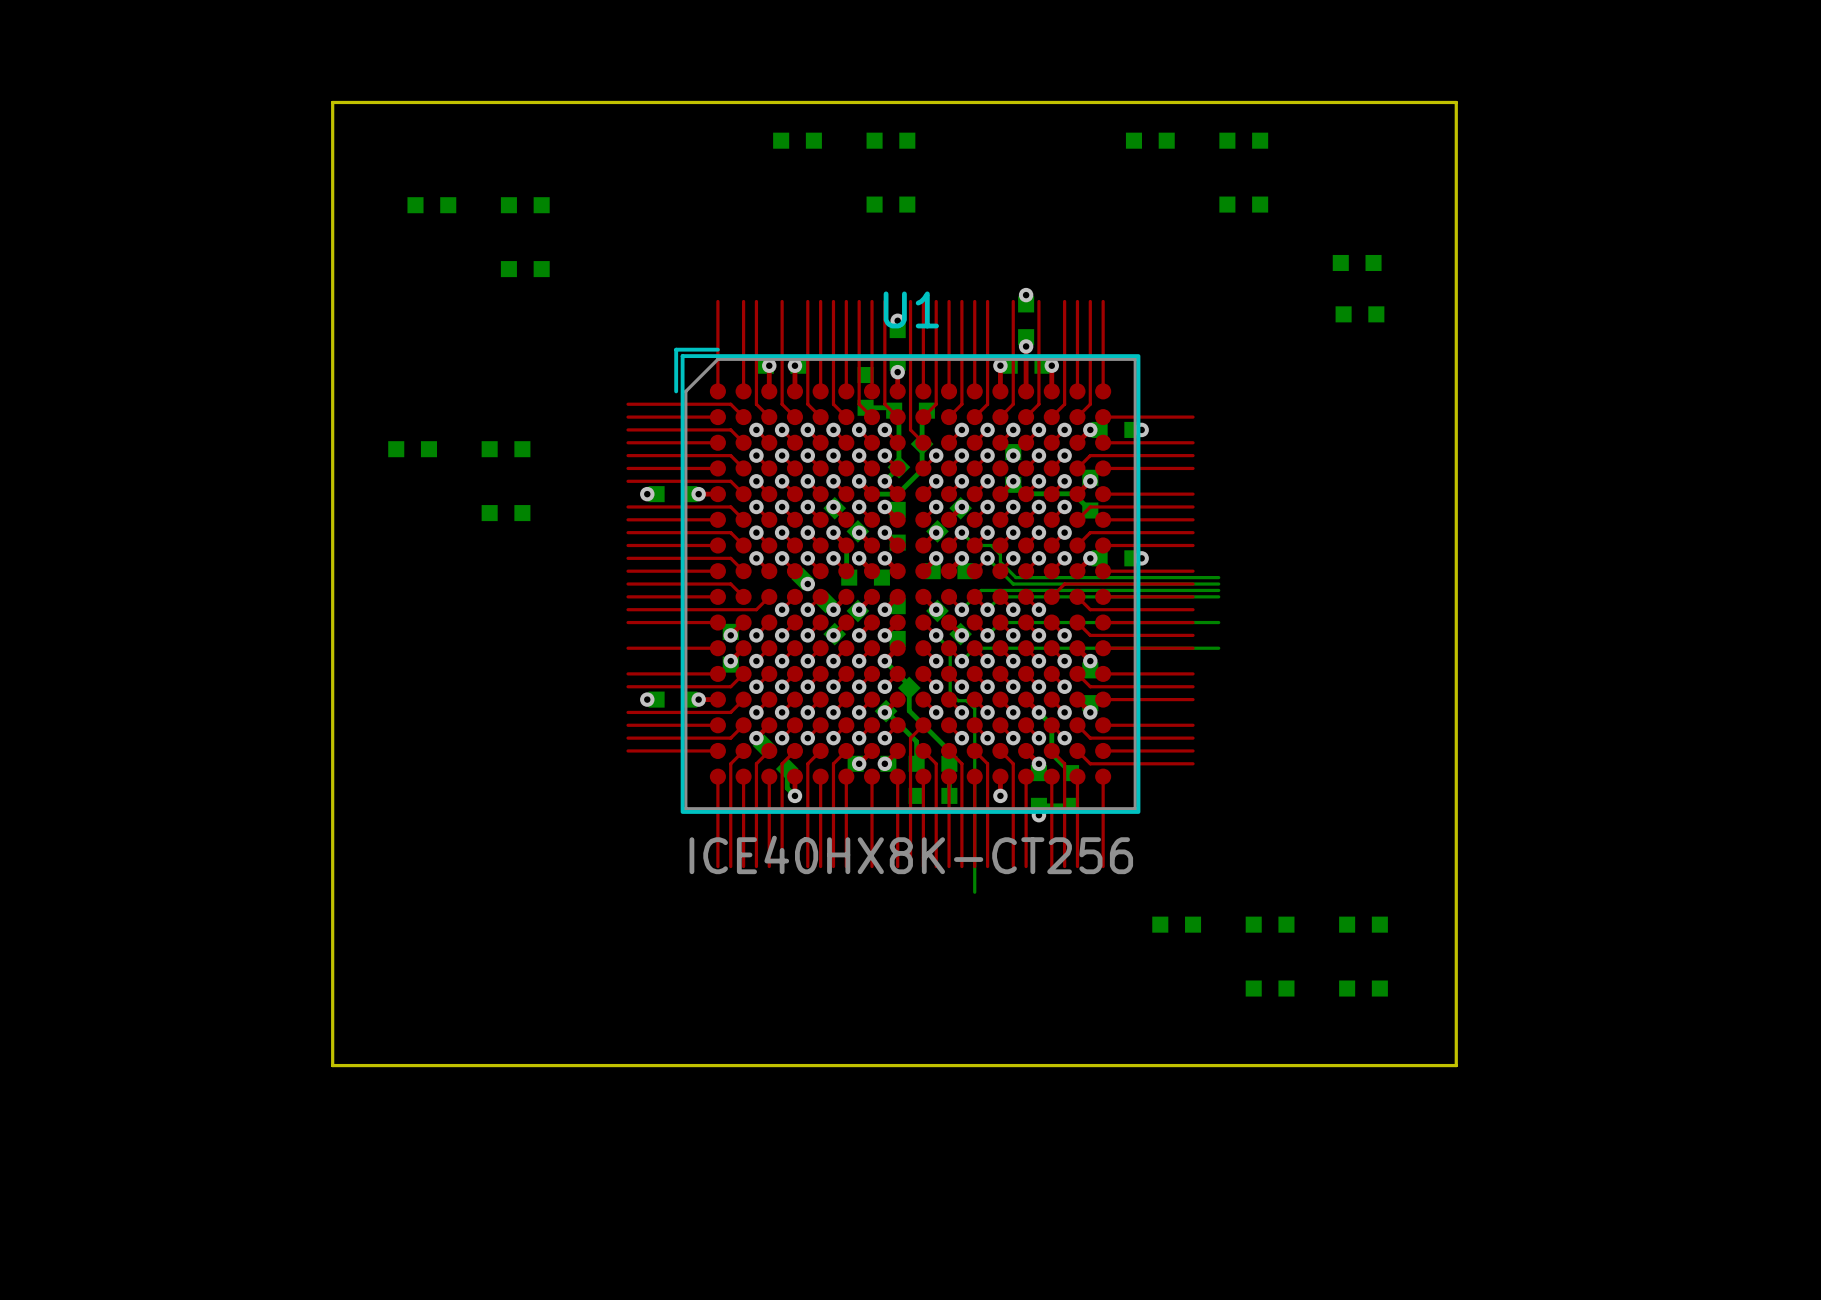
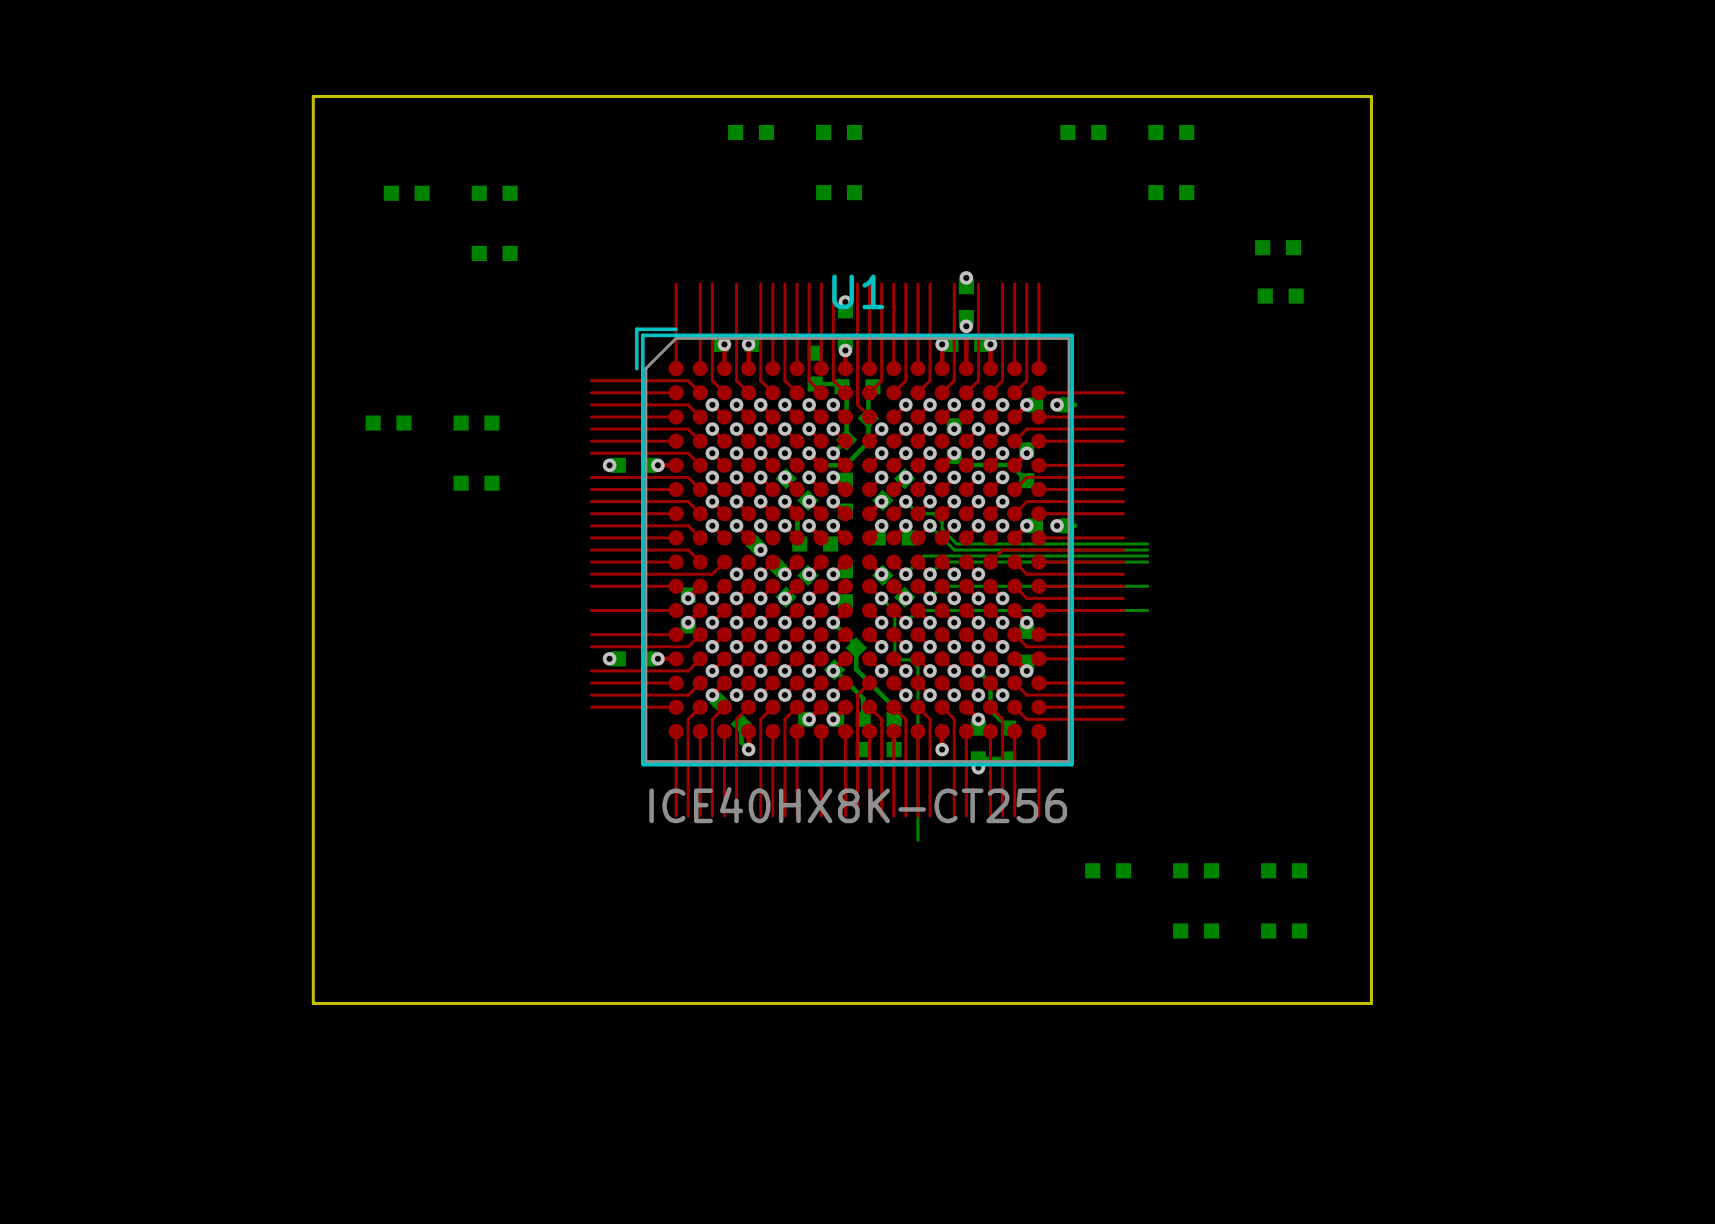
via position: (1141, 429) -> (1057, 404)
via position: (1141, 558) -> (1057, 525)

